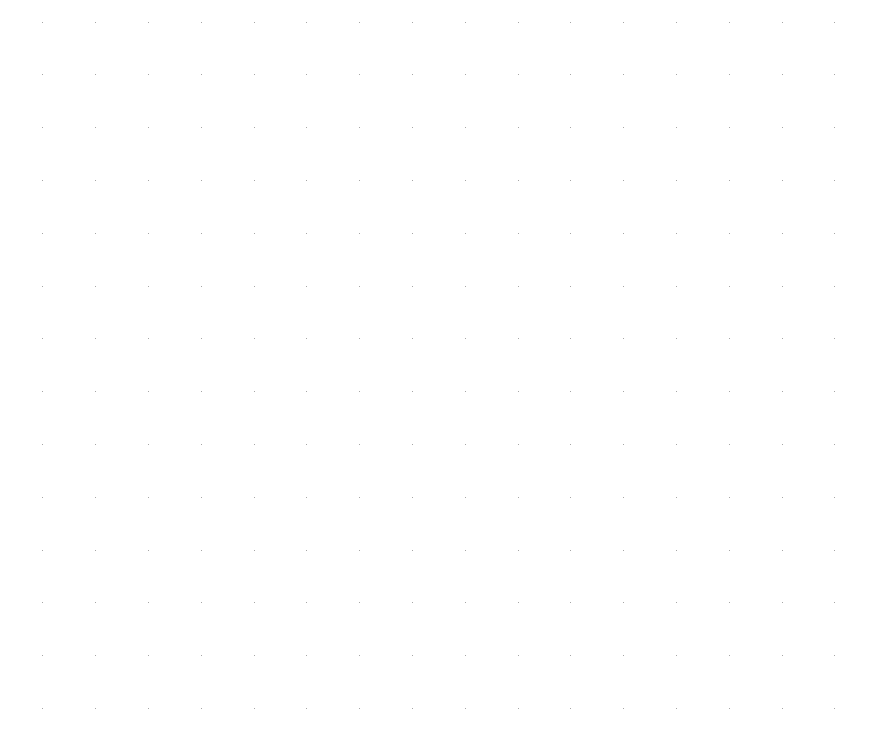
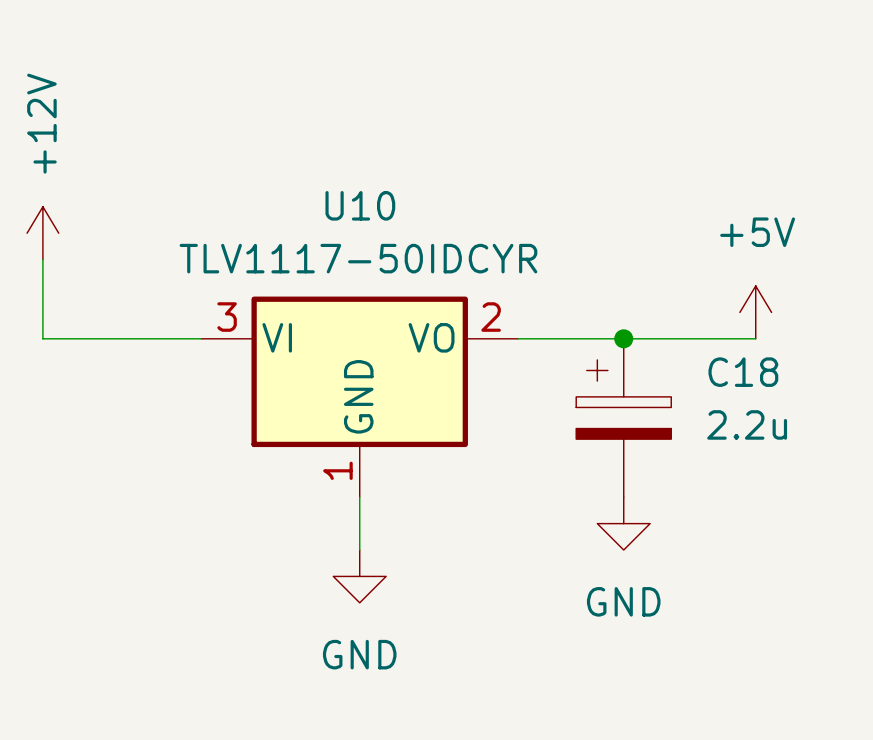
power symbol: none -> +12V (42, 233)
wire: none -> (42, 259) (42, 338) (201, 338)
power symbol: none -> +5V (755, 312)
wire: none -> (518, 338) (755, 338)
junction: none -> (623, 338)
U10: none -> TLV1117-50IDCYR (359, 396)
C18: none -> 2.2u (623, 418)
wire: none -> (359, 497) (359, 550)
power symbol: none -> GND (623, 523)
power symbol: none -> GND (359, 576)

